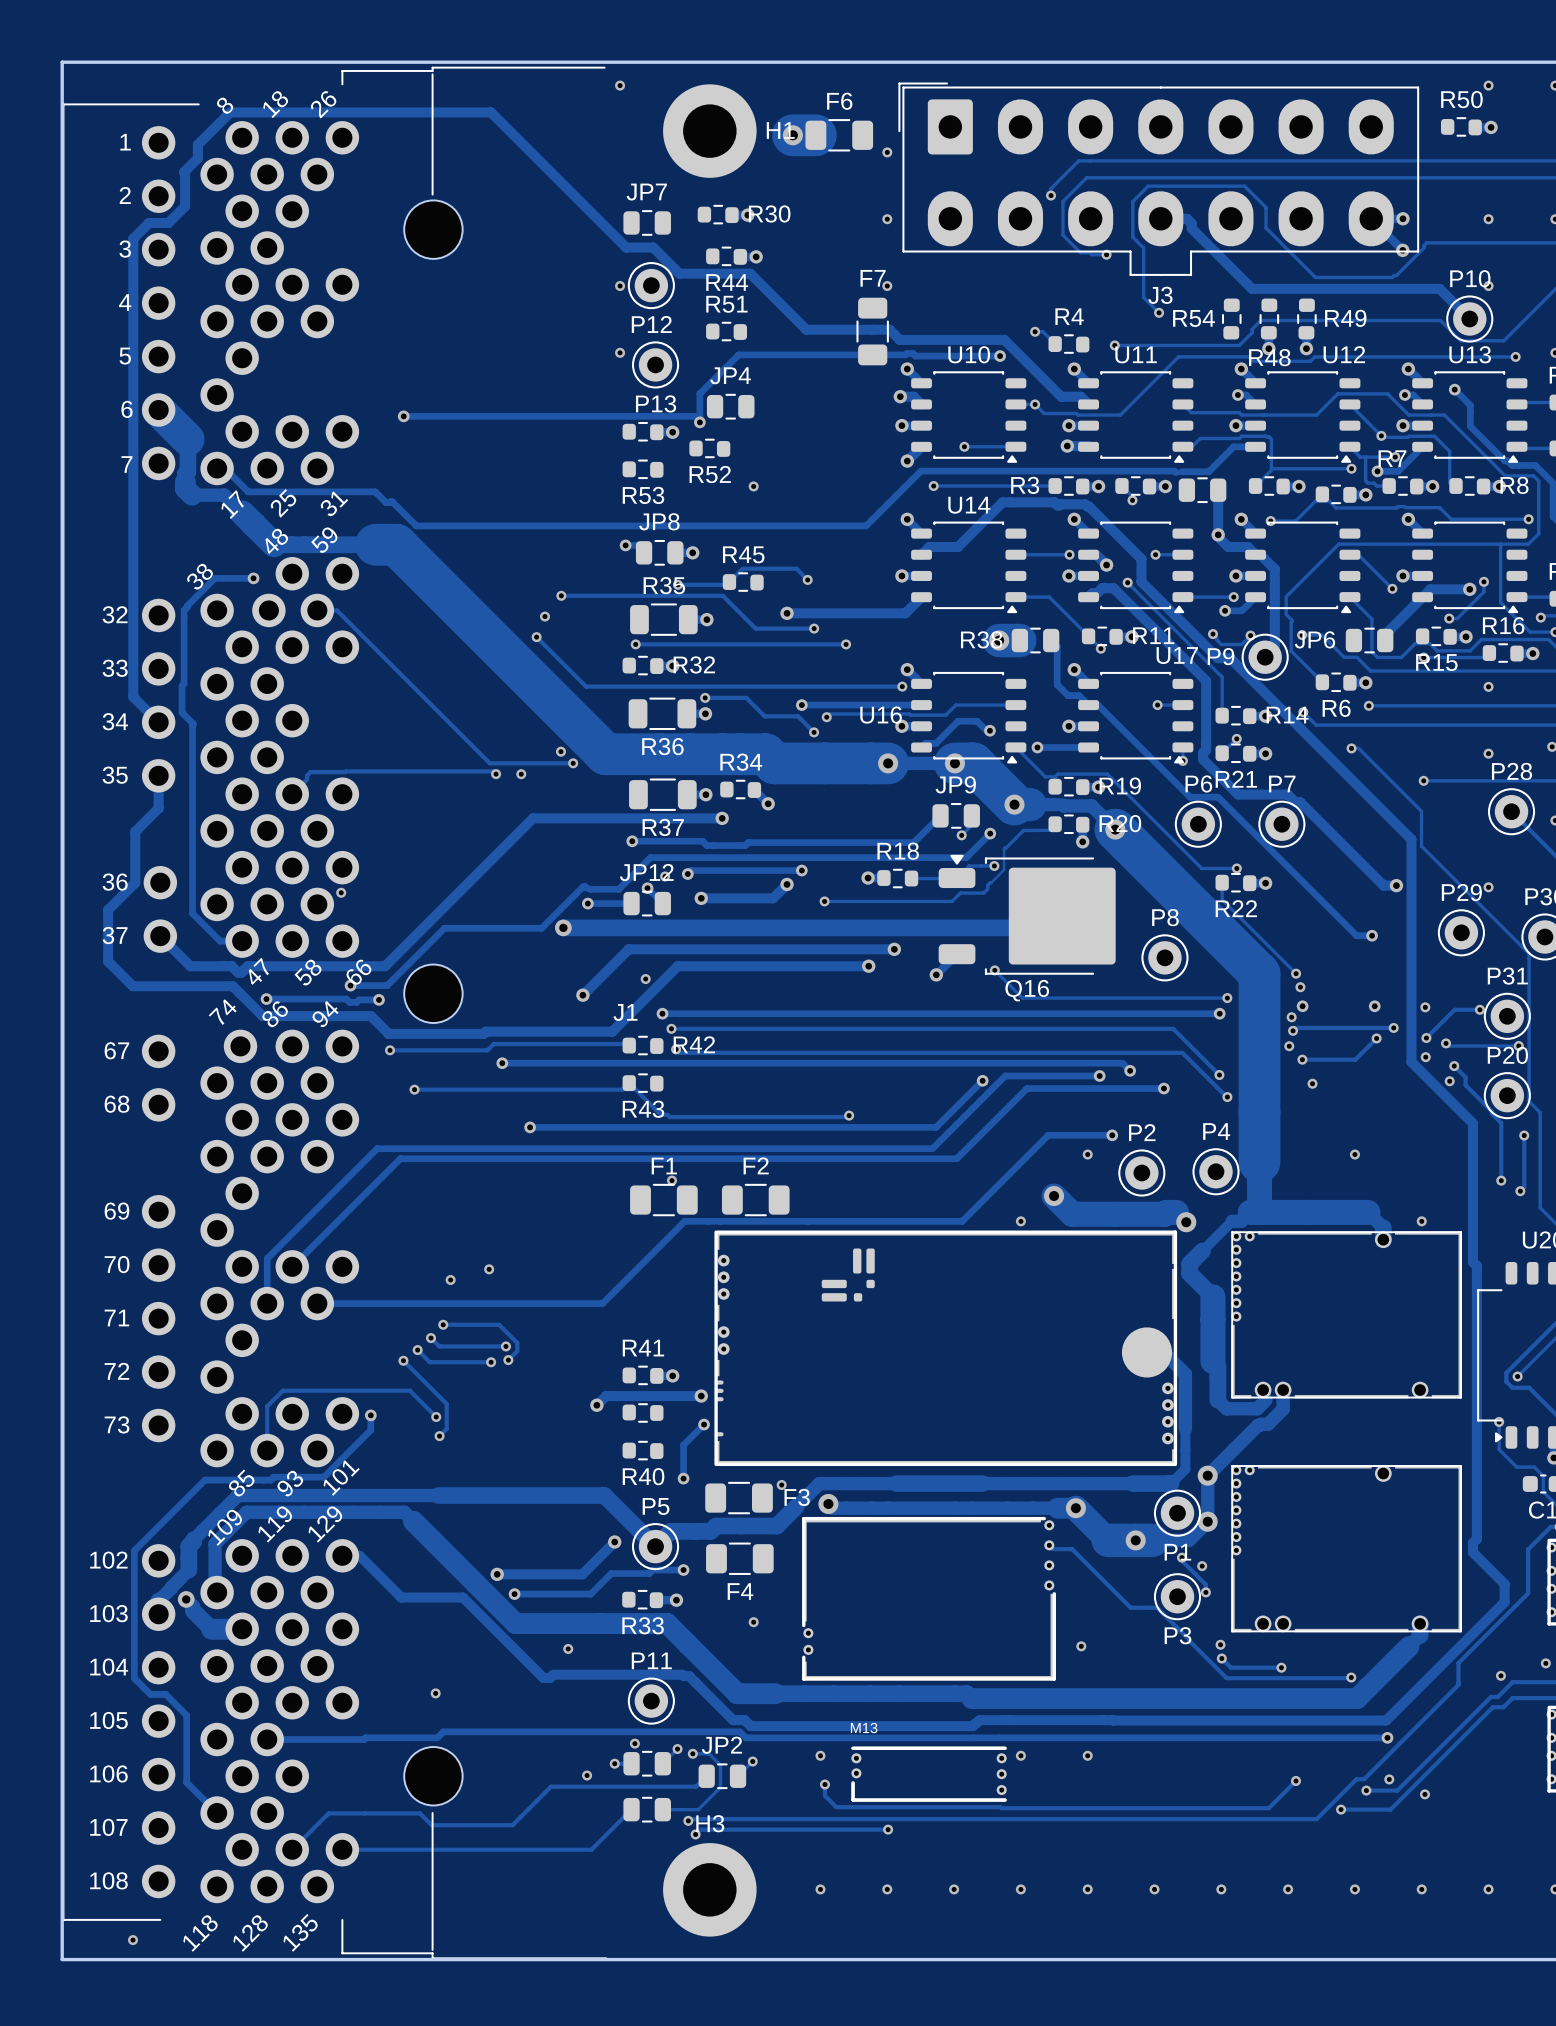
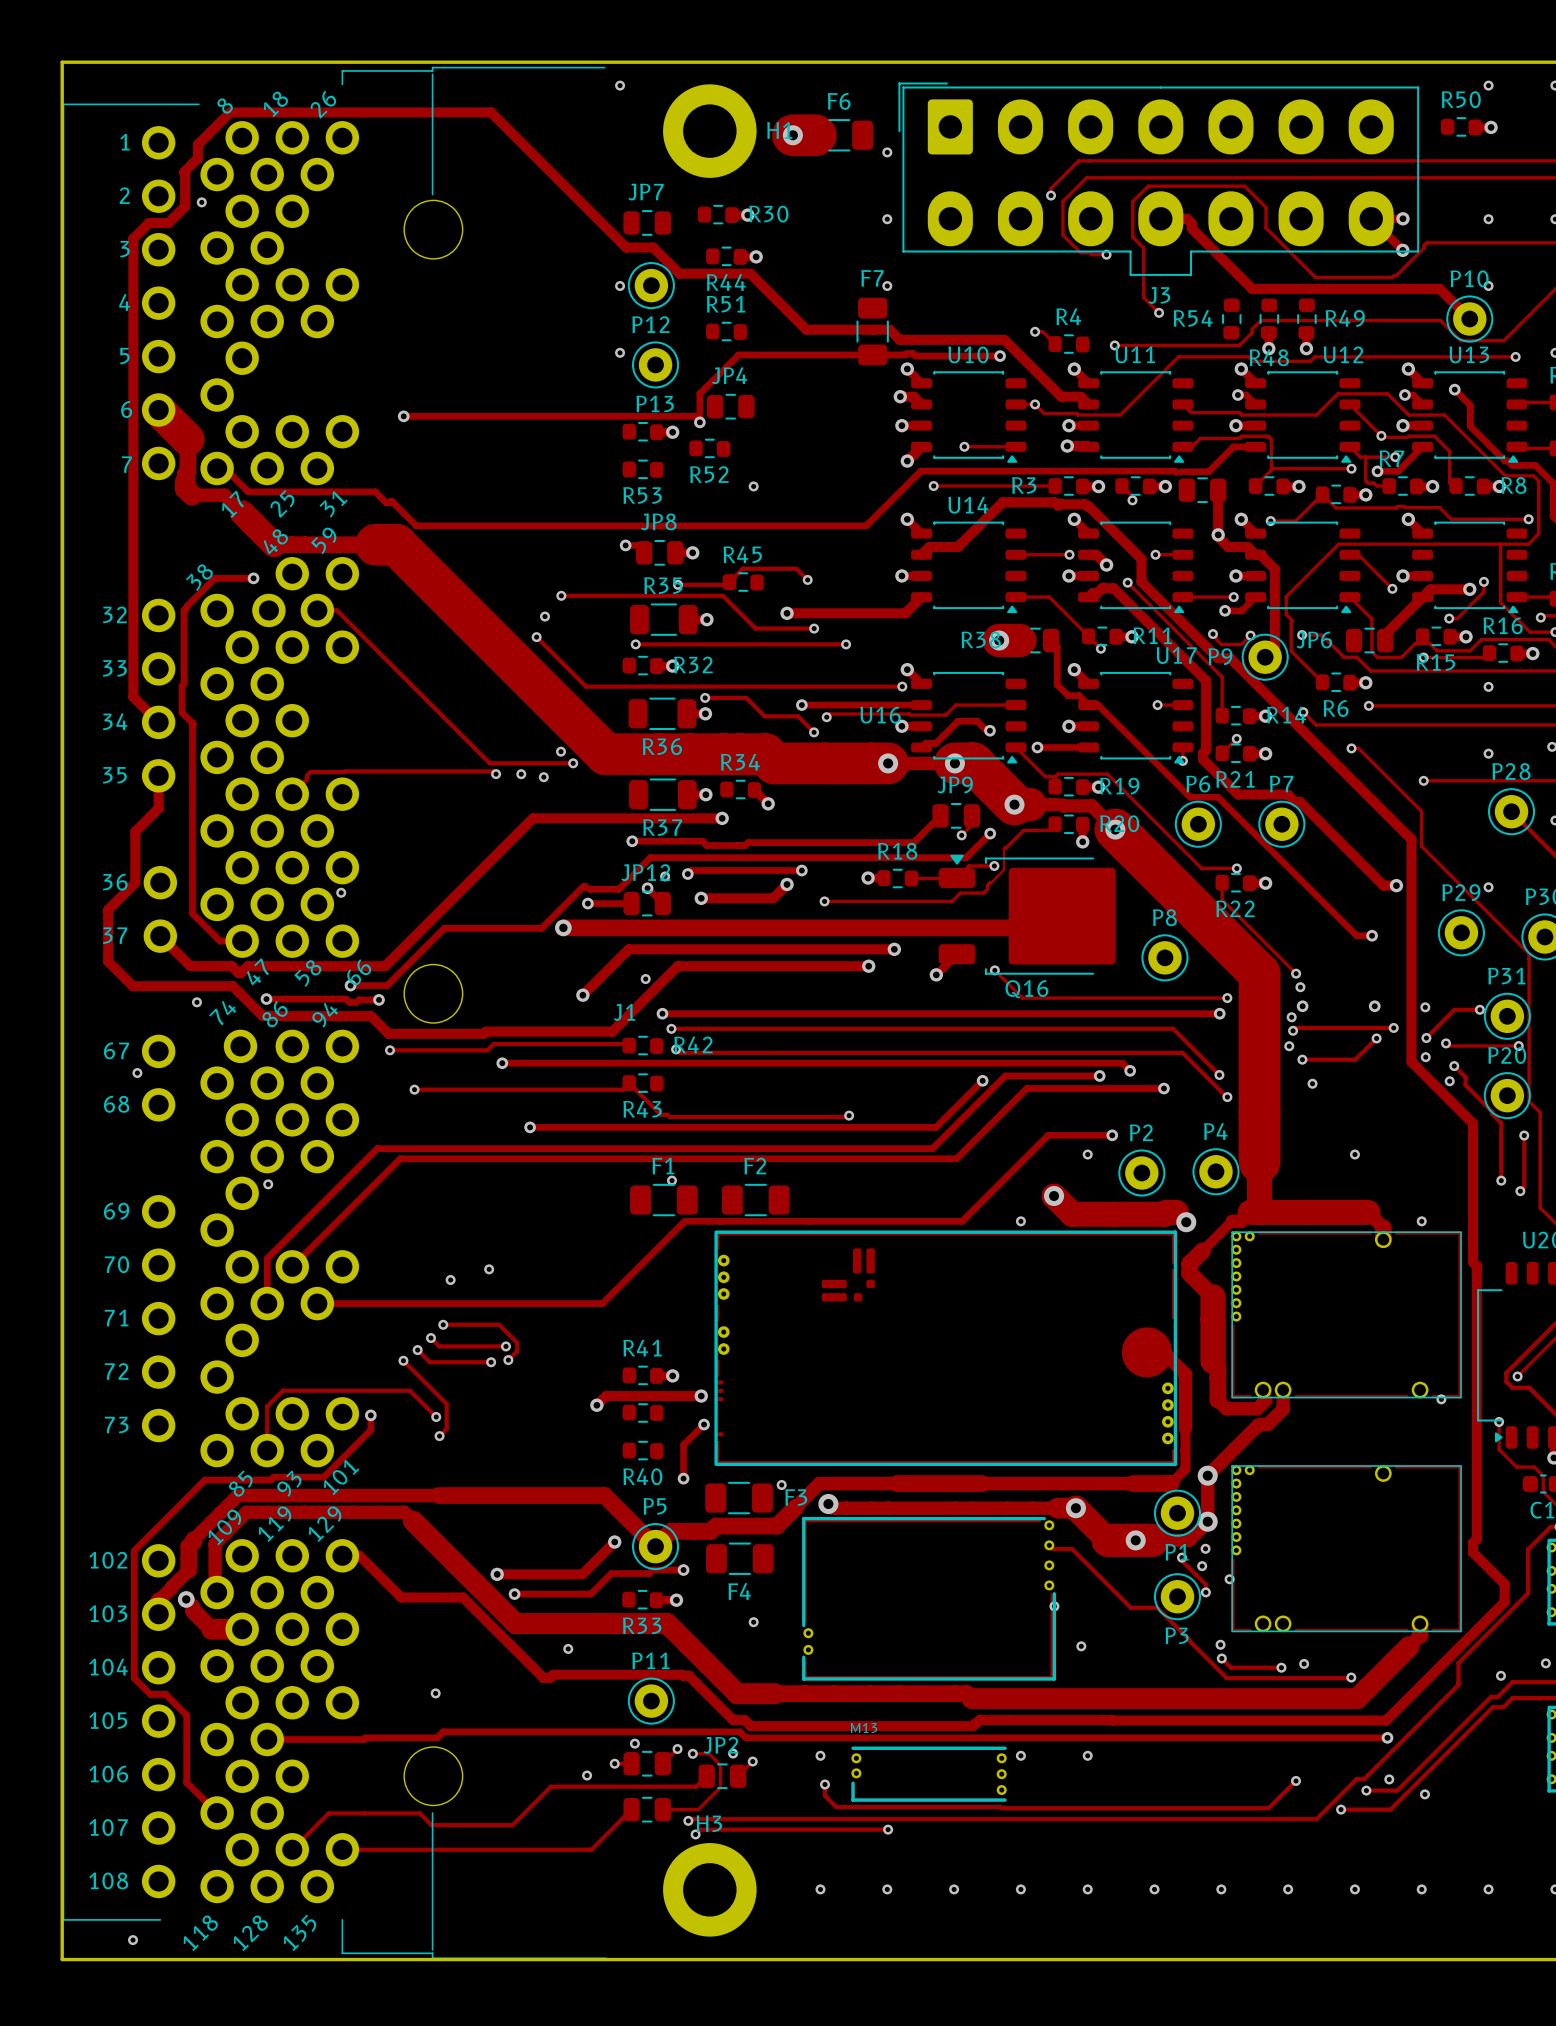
via: none -> (201, 202)
via: none -> (543, 777)
via: none -> (196, 1002)
via: none -> (137, 1073)
via: none -> (268, 1184)
via: none -> (1441, 1399)
via: none -> (1205, 1548)
via: none -> (1229, 1579)
via: none -> (1054, 1606)
via: none -> (1304, 1663)
via: none -> (733, 1753)

